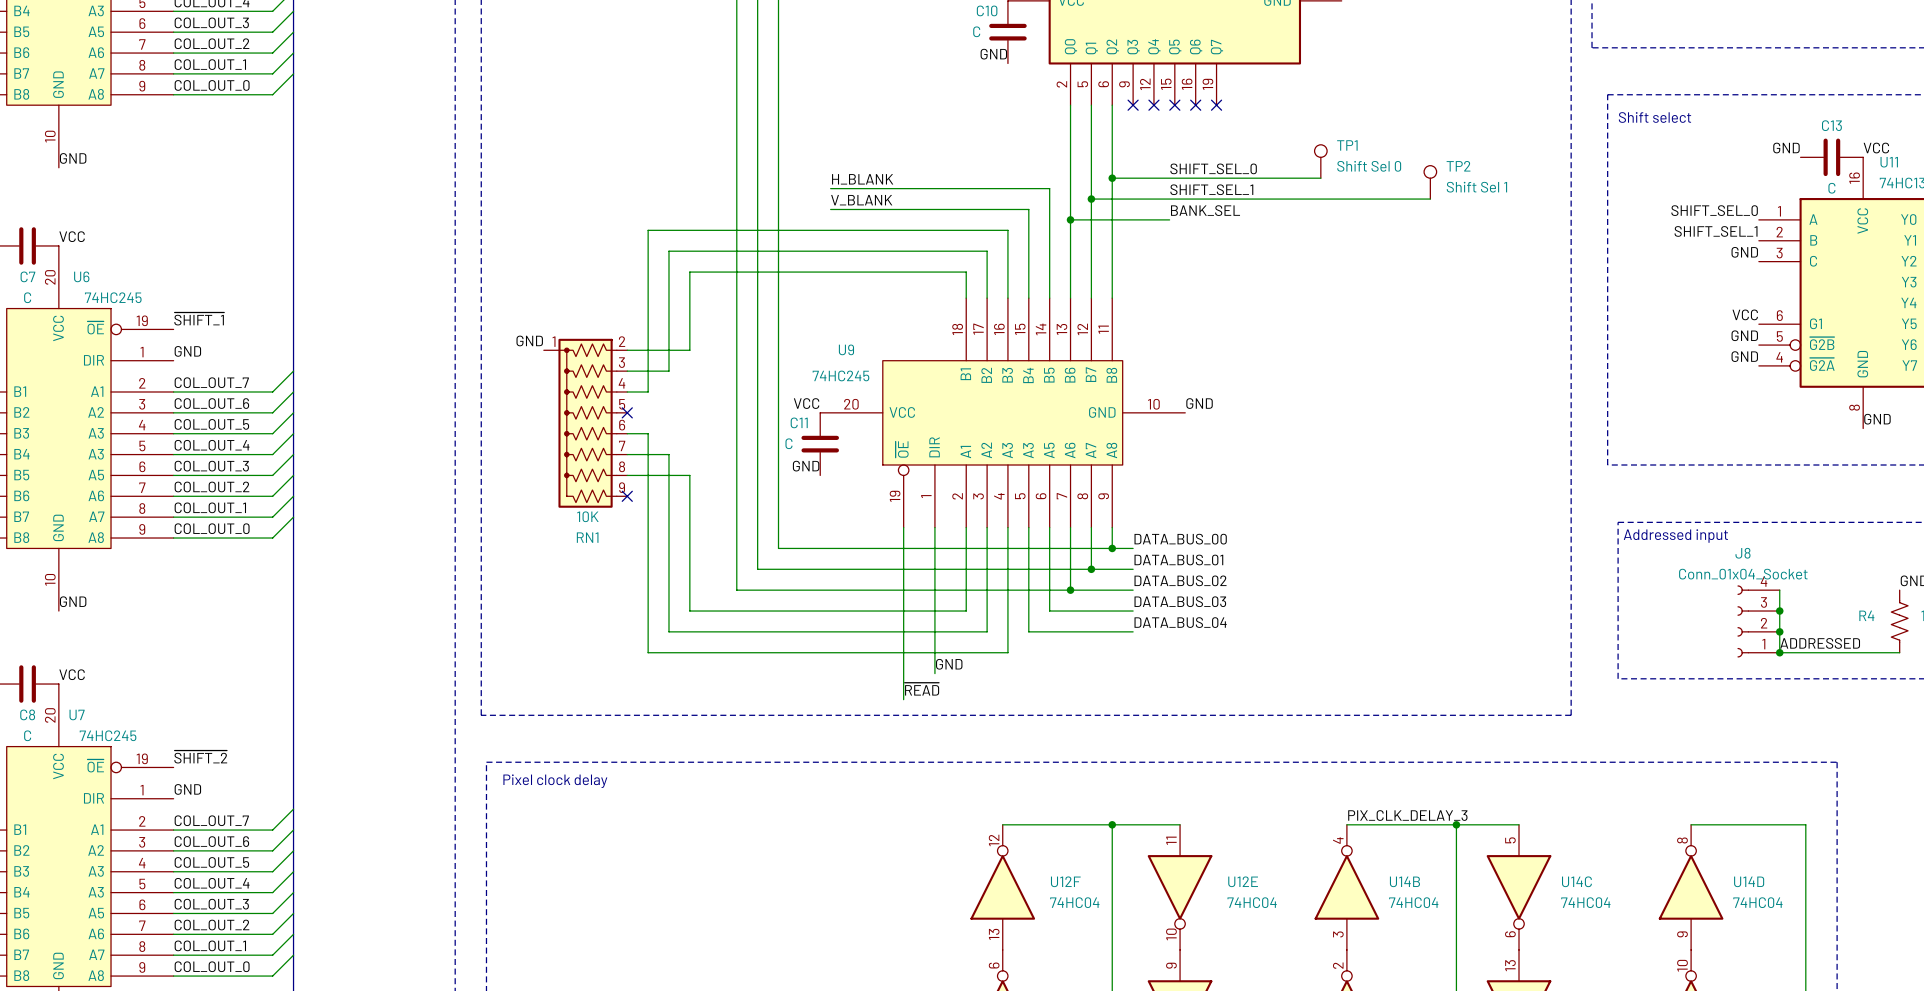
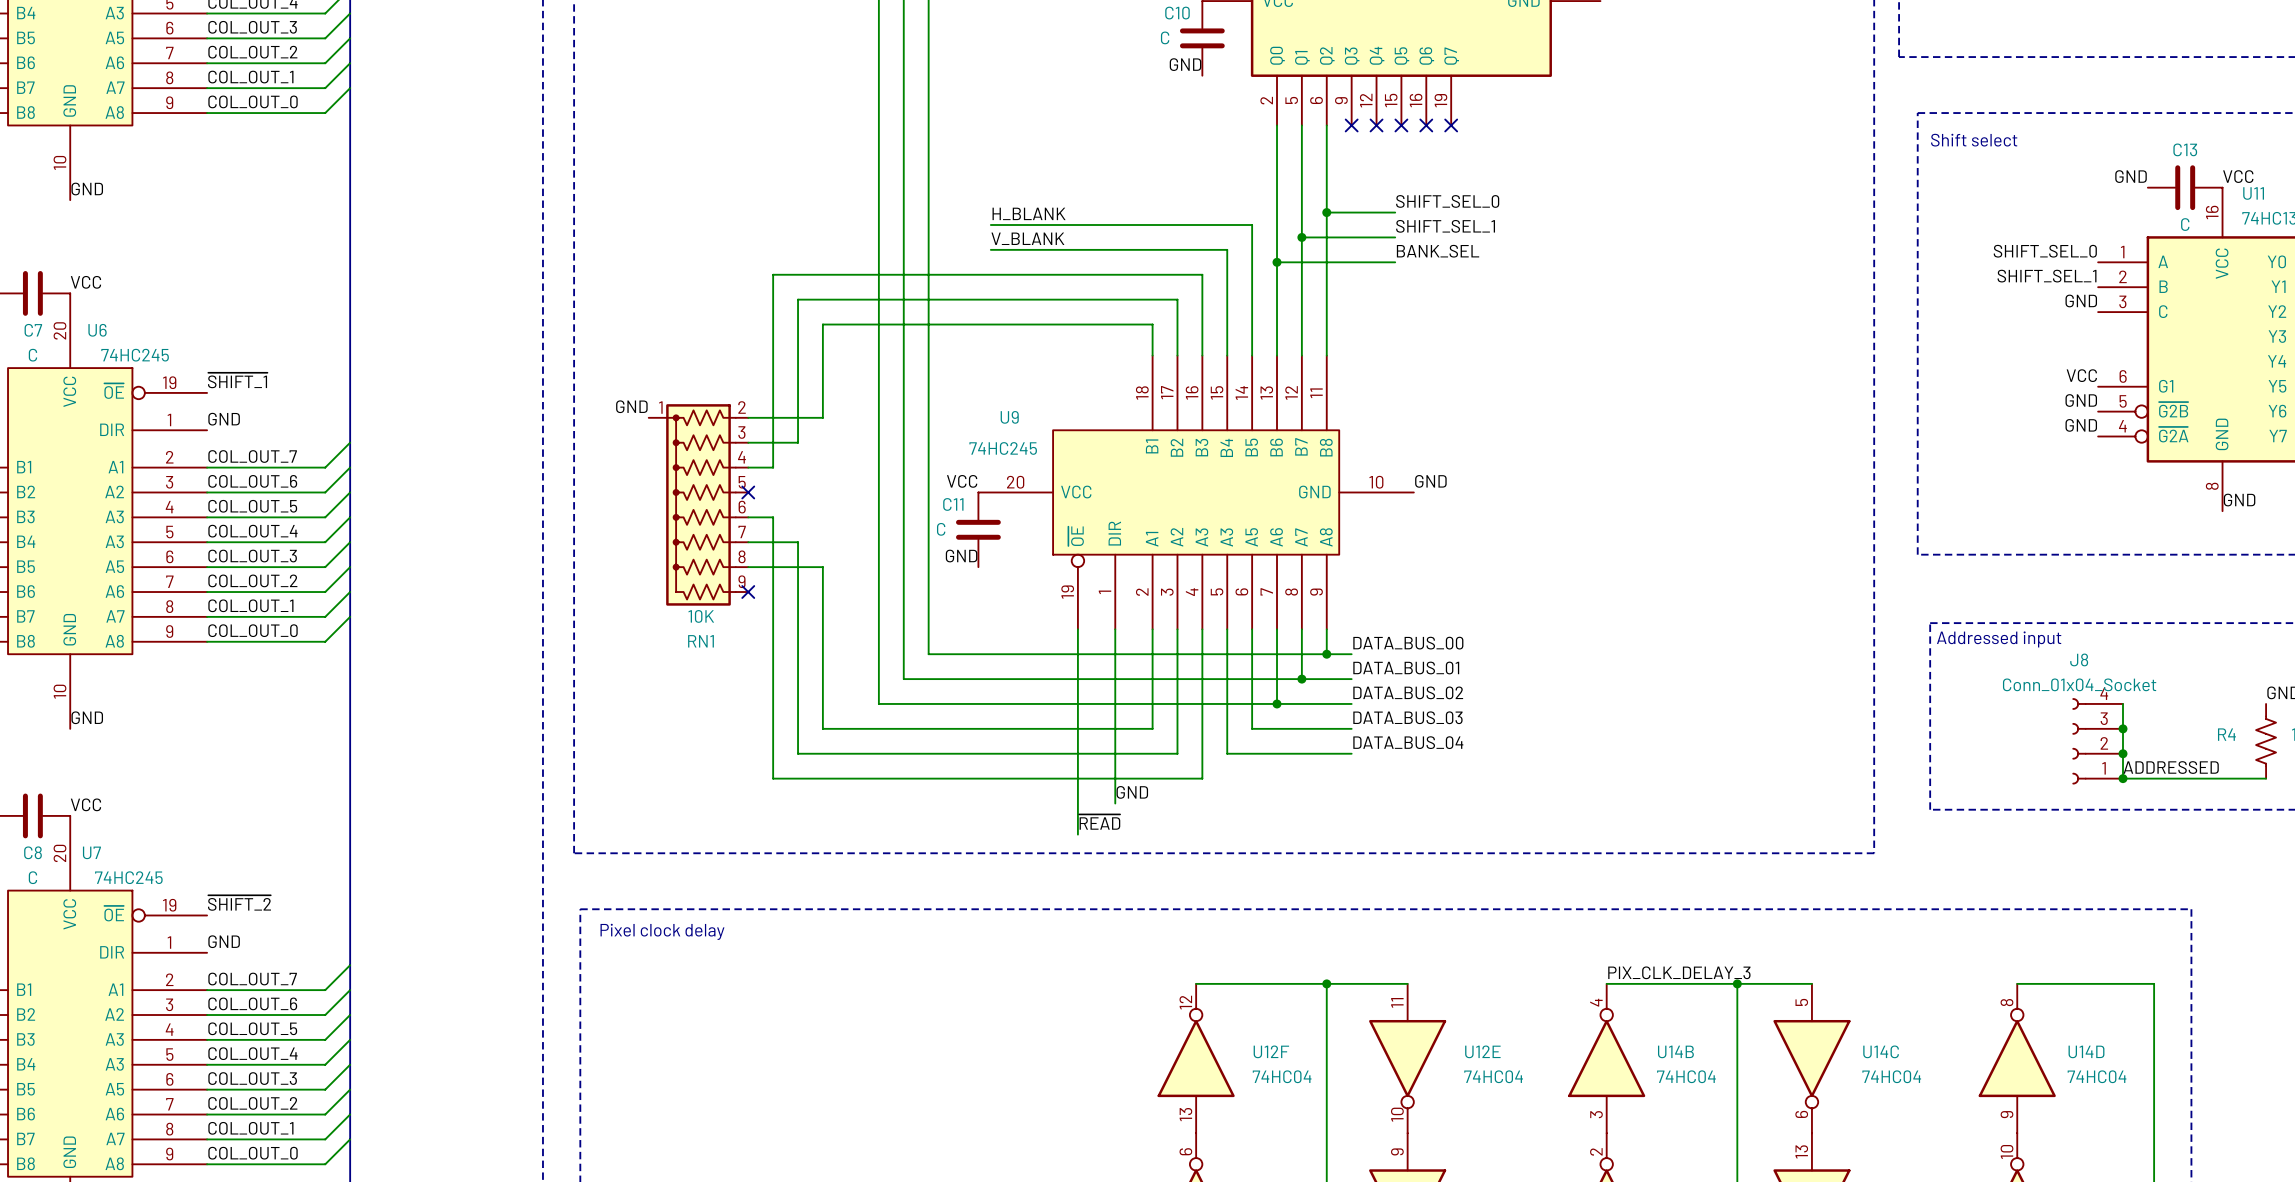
TP1: Shift Sel 0 (1320, 161) -> none
wire: (1169, 178) (1320, 178) -> none
TP2: Shift Sel 1 (1430, 182) -> none
wire: (1169, 199) (1430, 199) -> none

